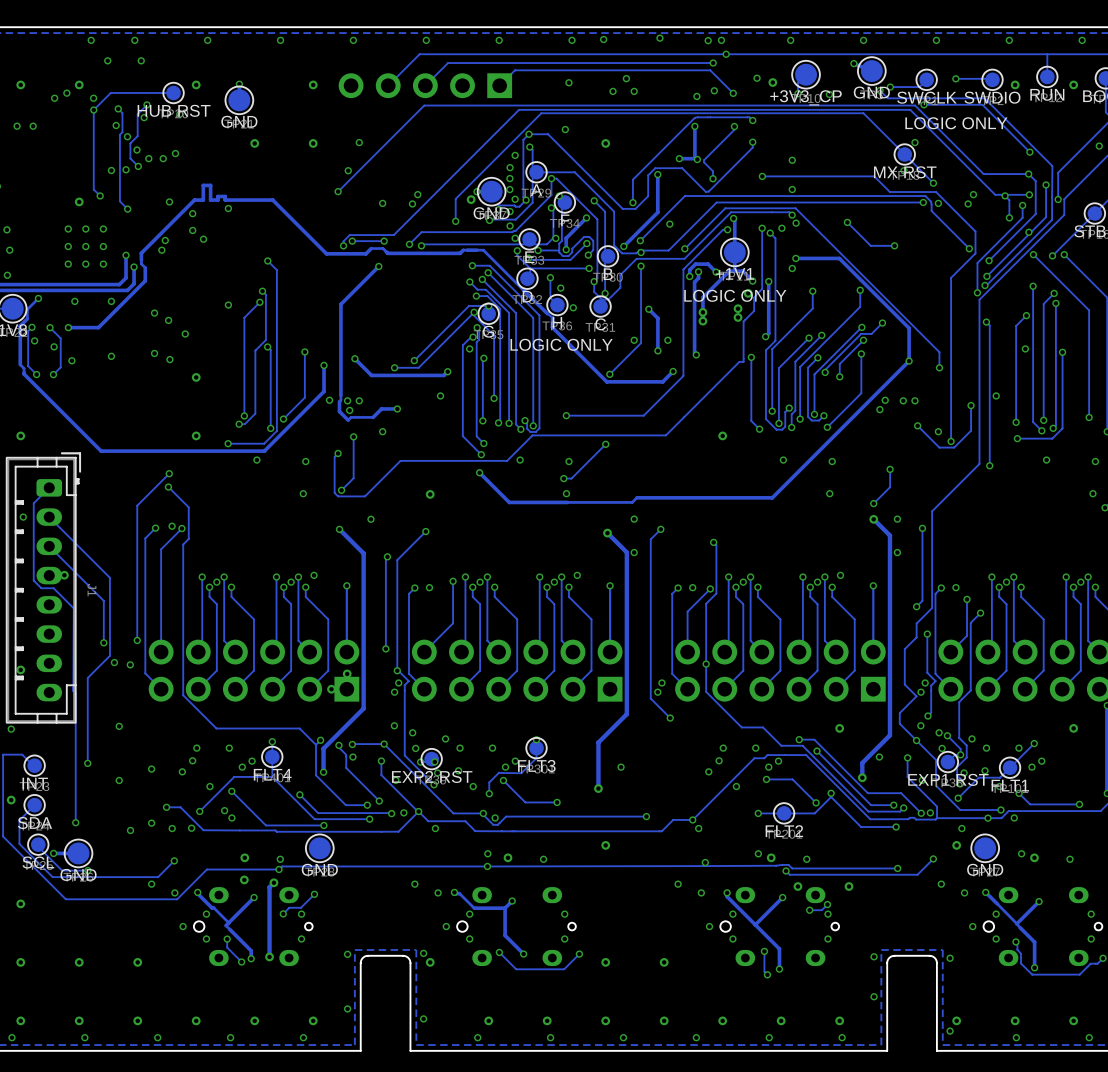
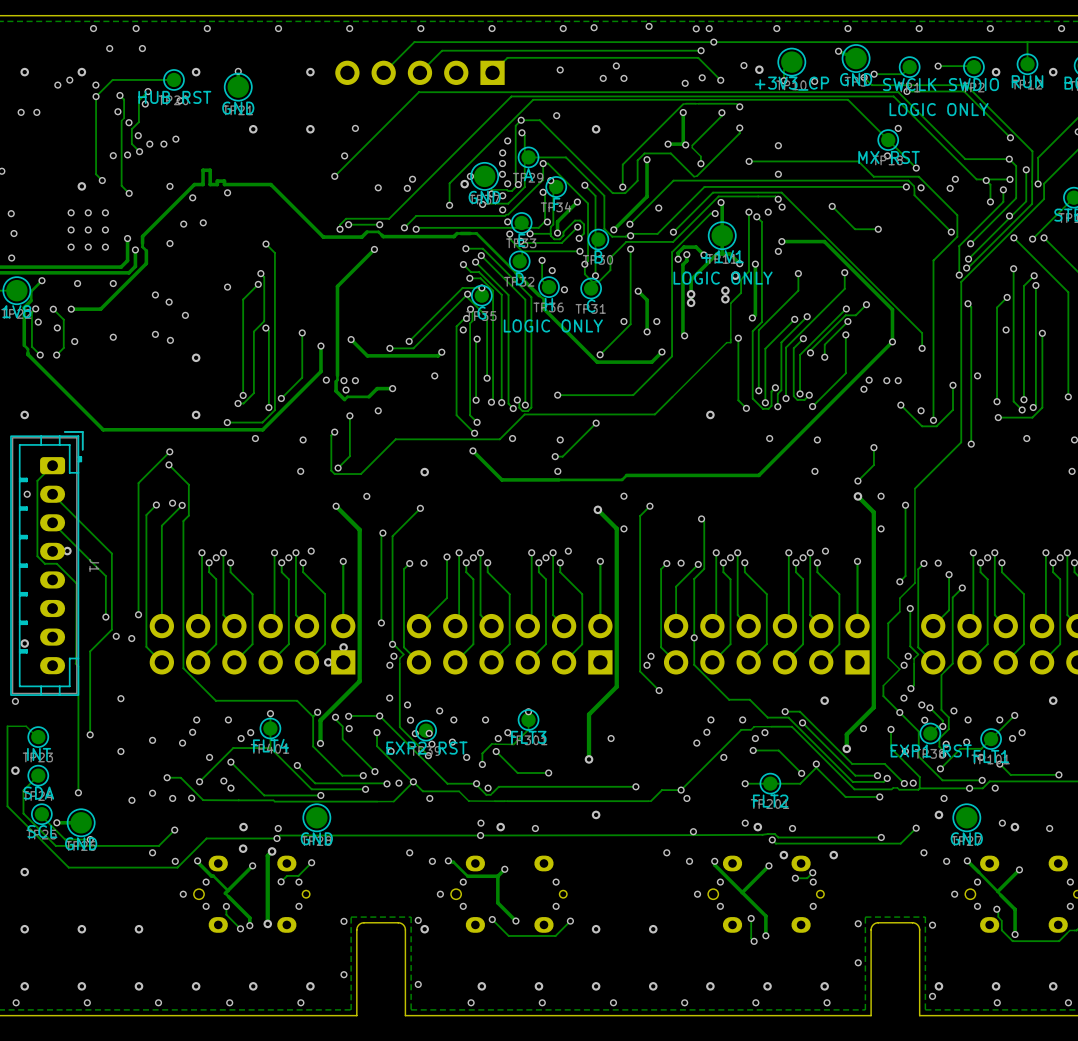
via: (192, 230) -> none
via: (165, 240) -> none
via: none -> (183, 224)
via: (161, 250) -> none
via: none -> (169, 243)

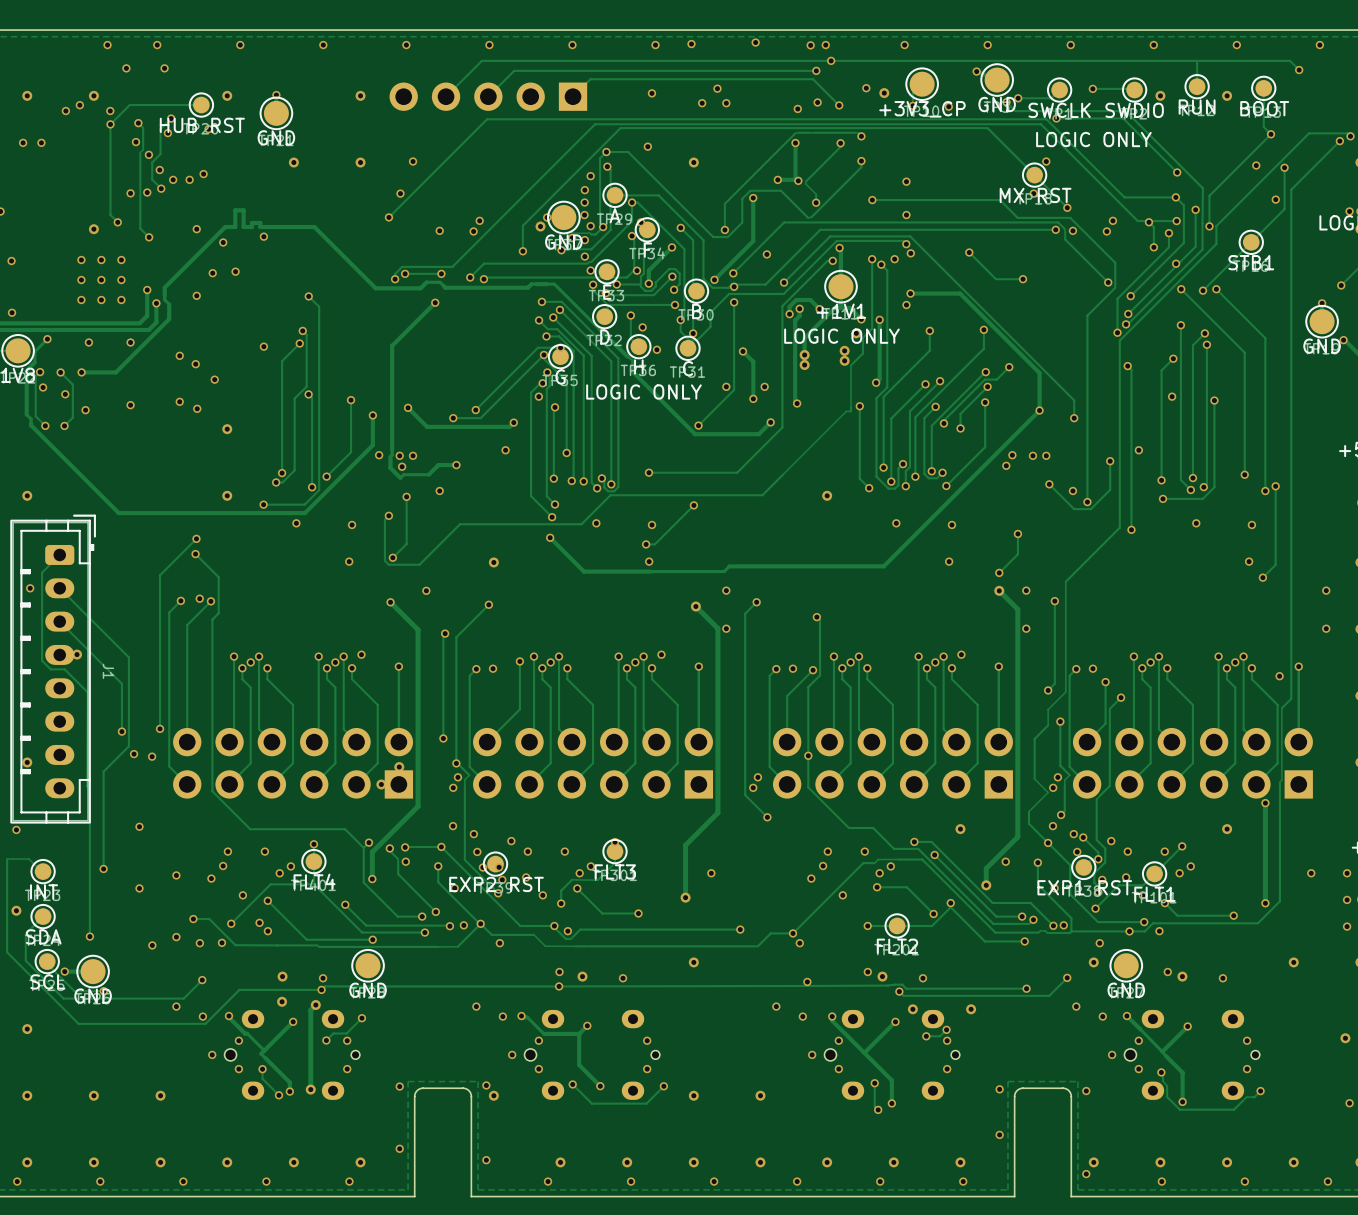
via: (14, 233) -> none

